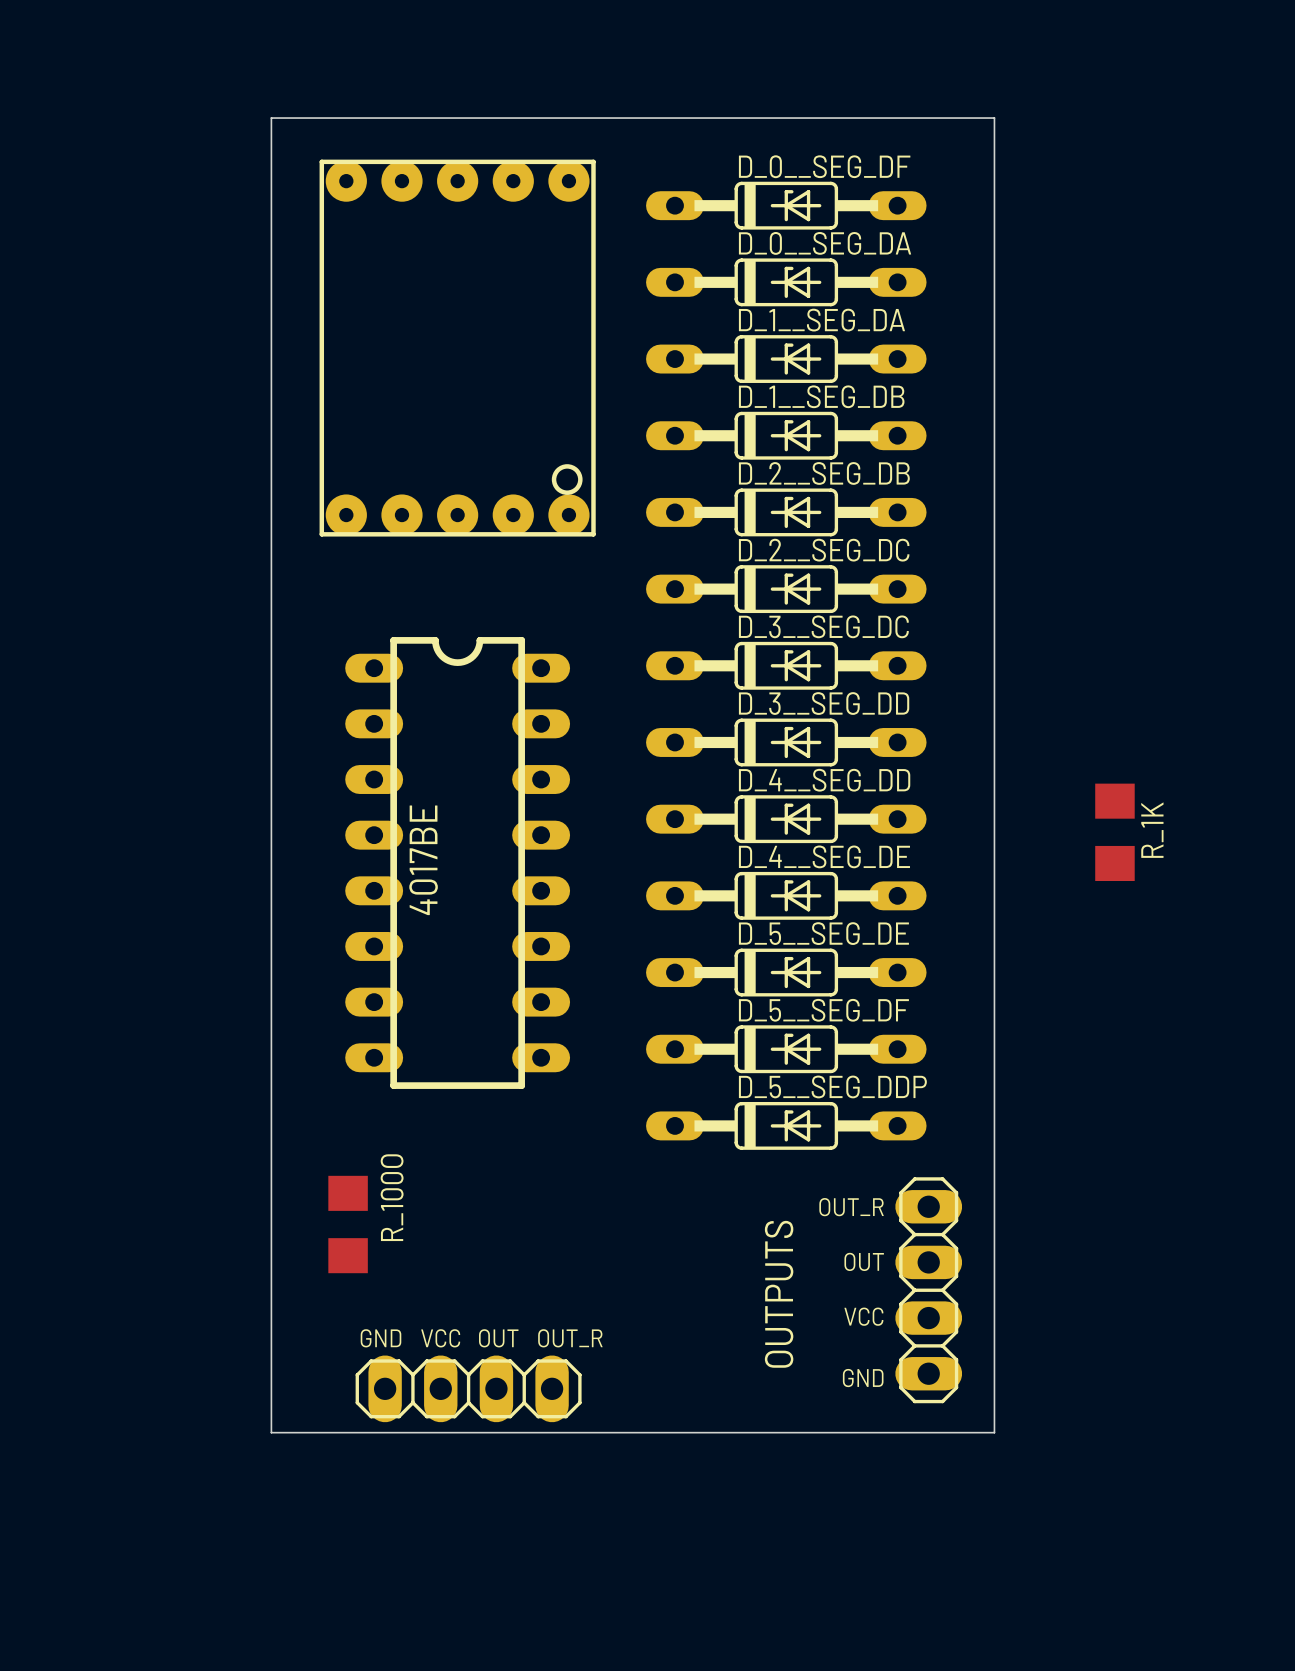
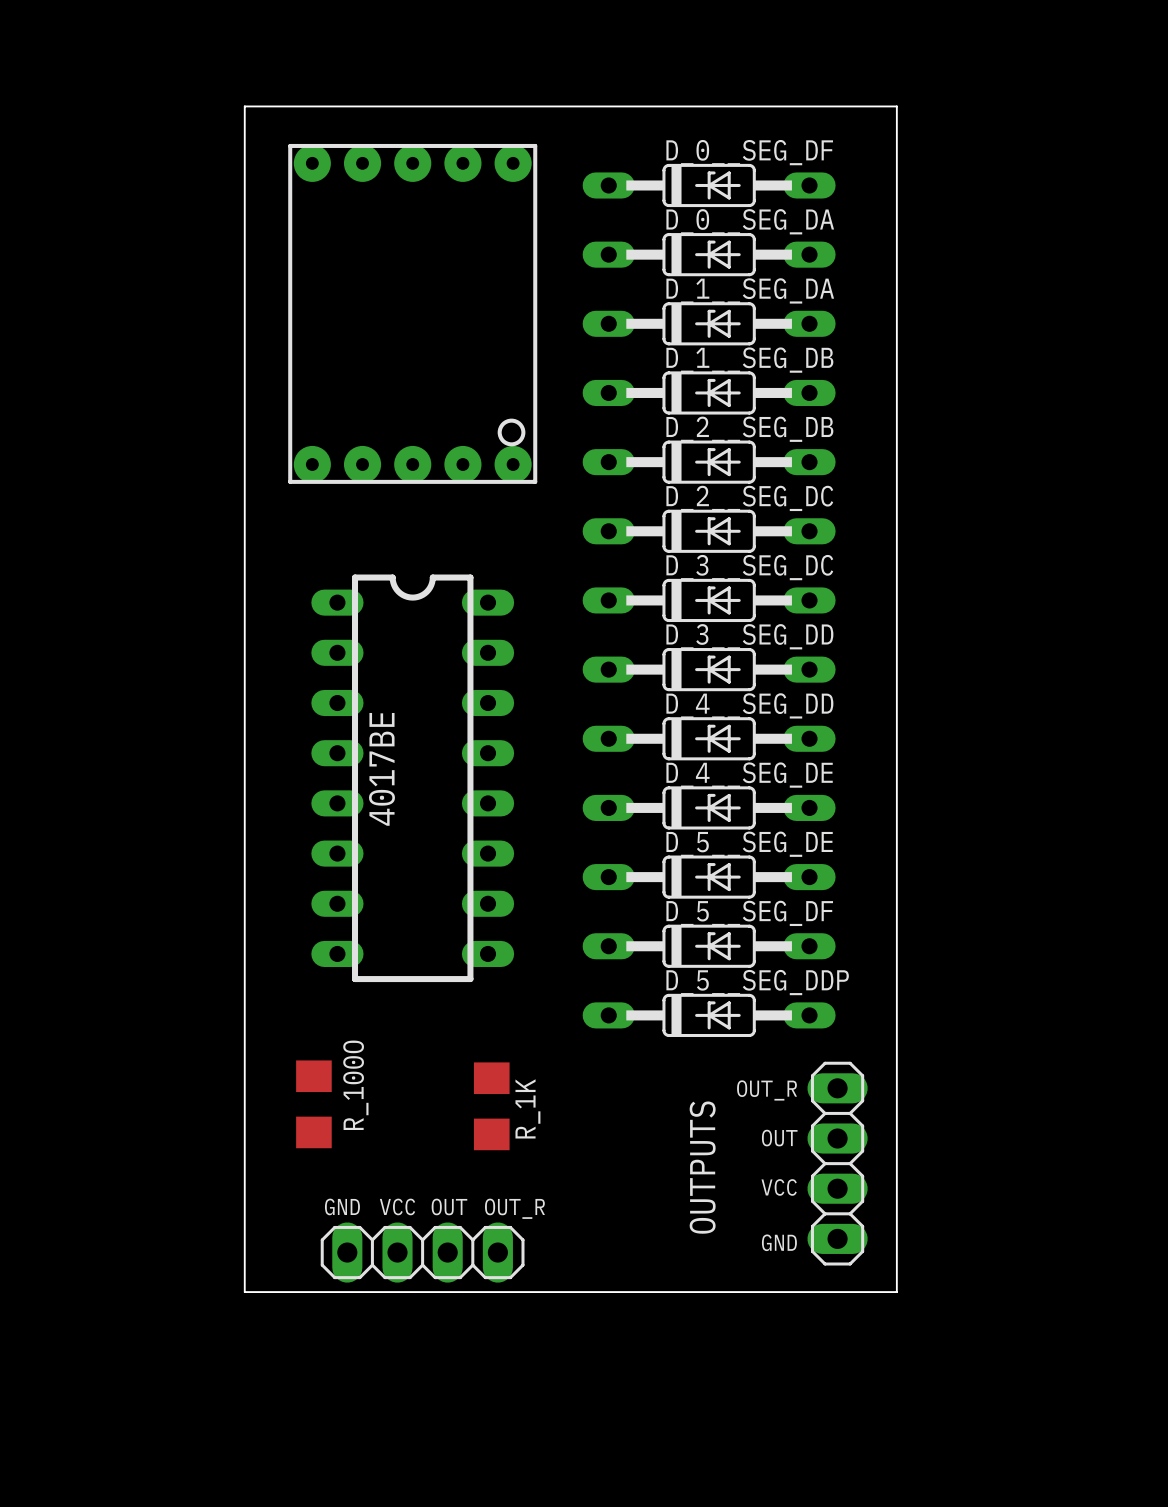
R_1K position: (1114, 832) -> (491, 1106)

